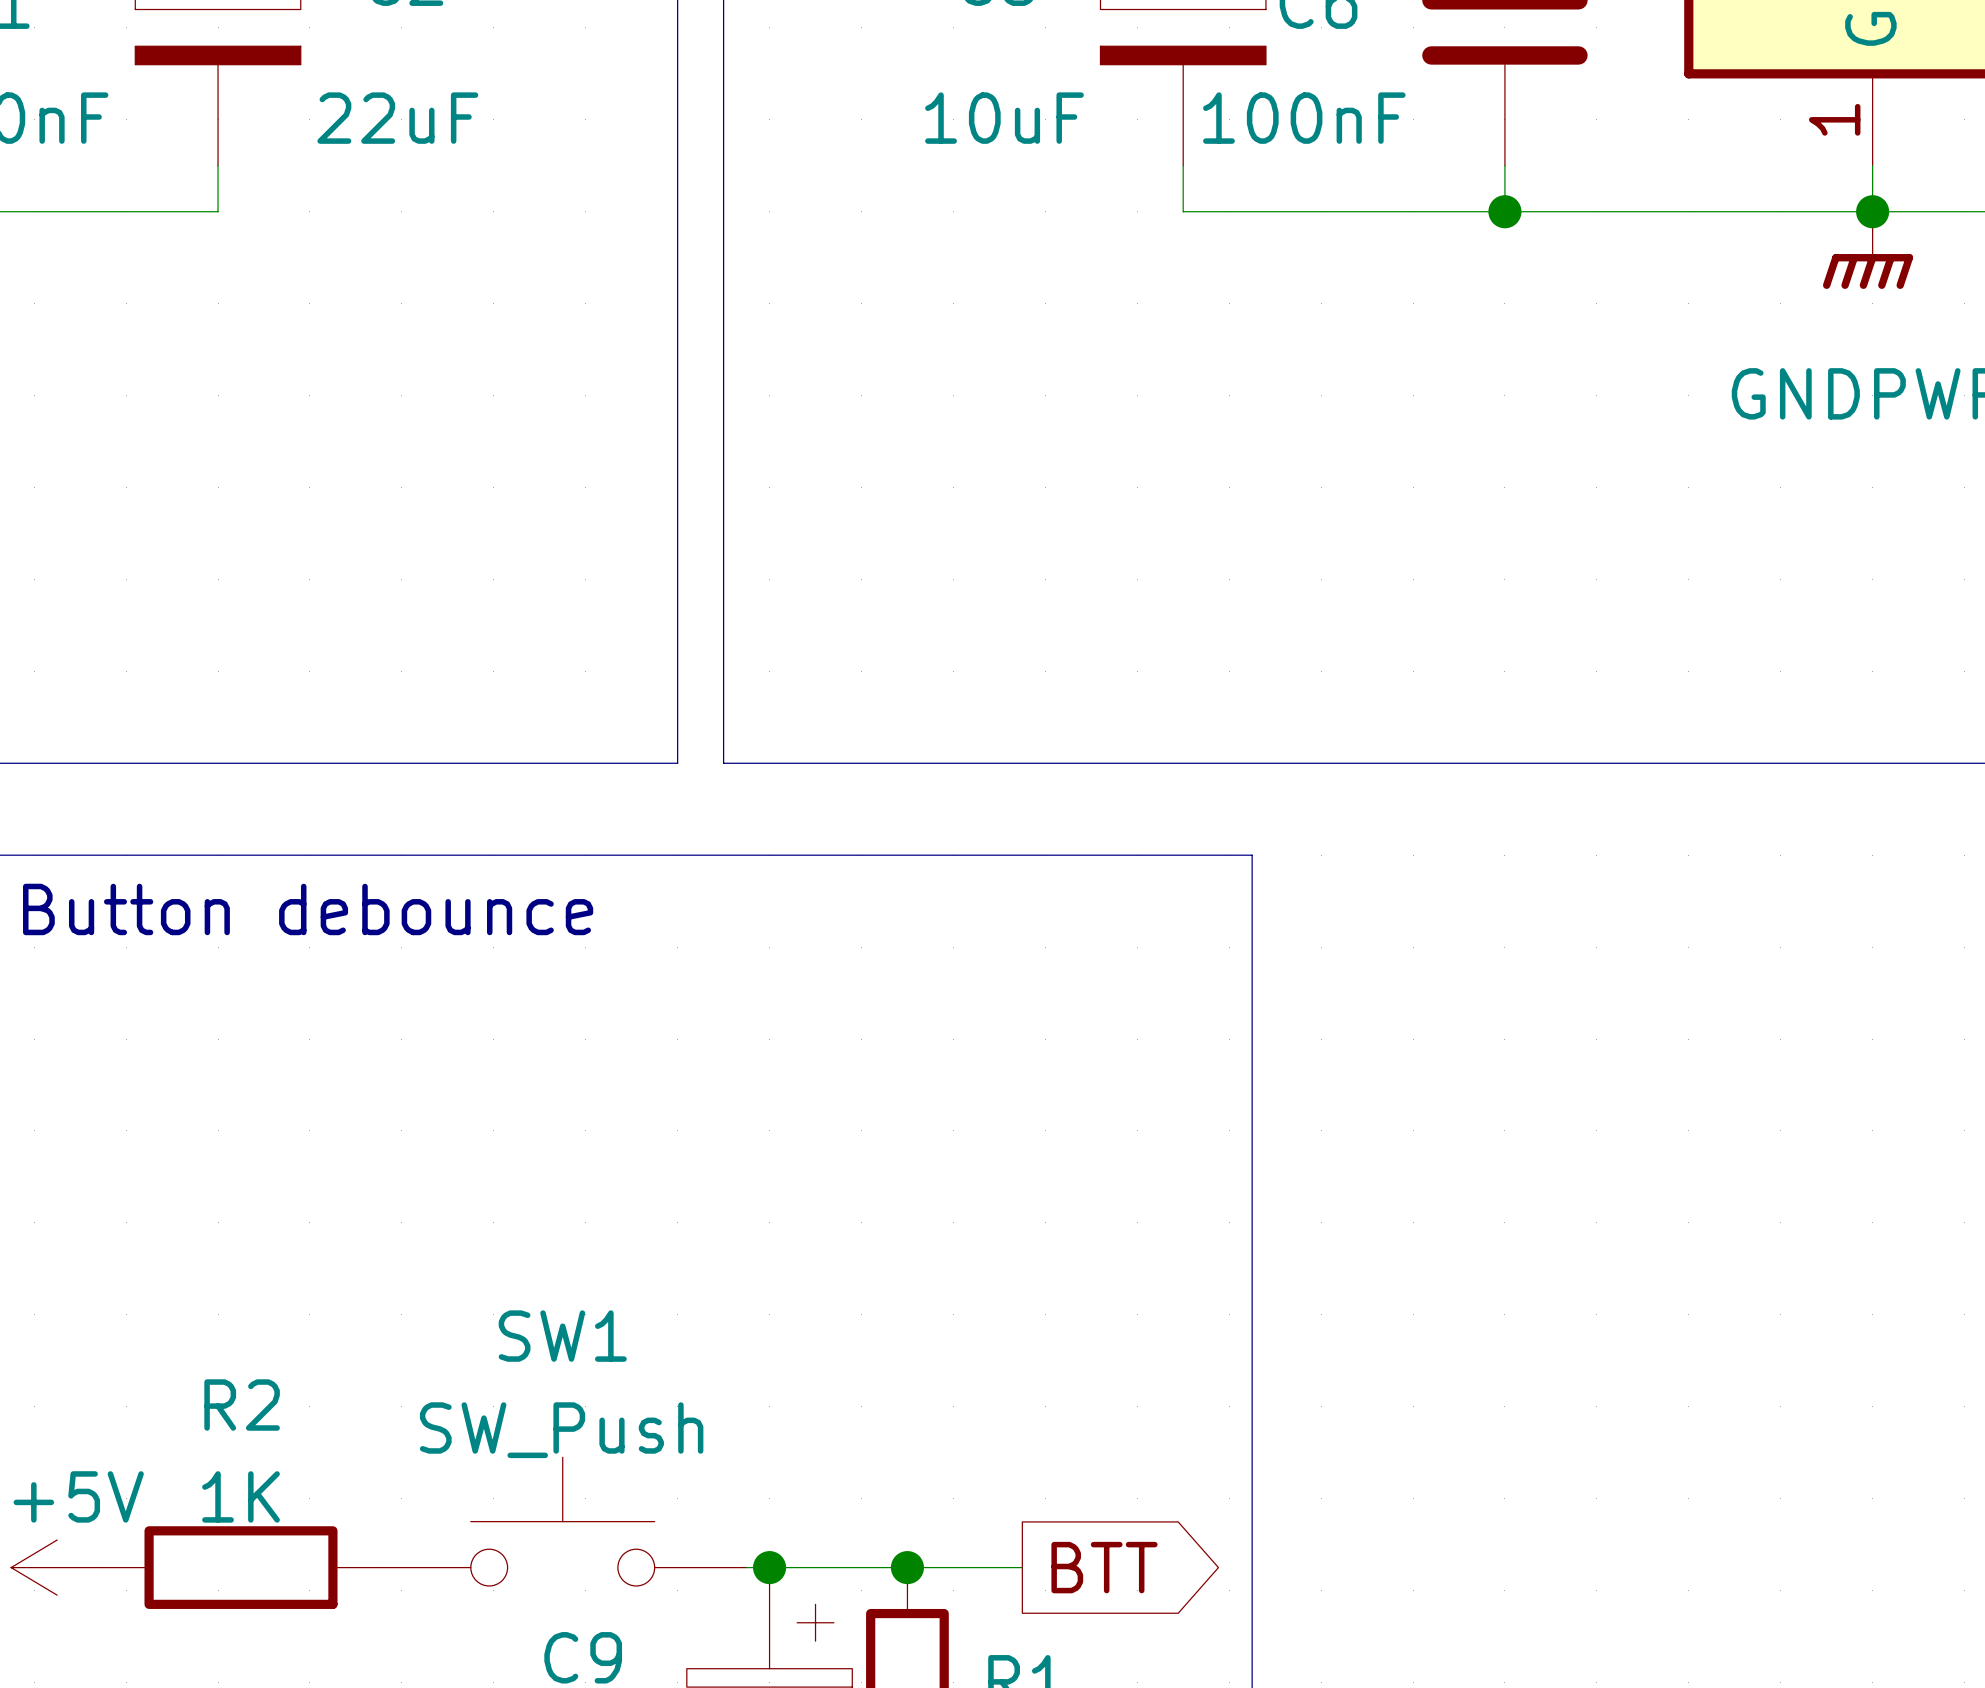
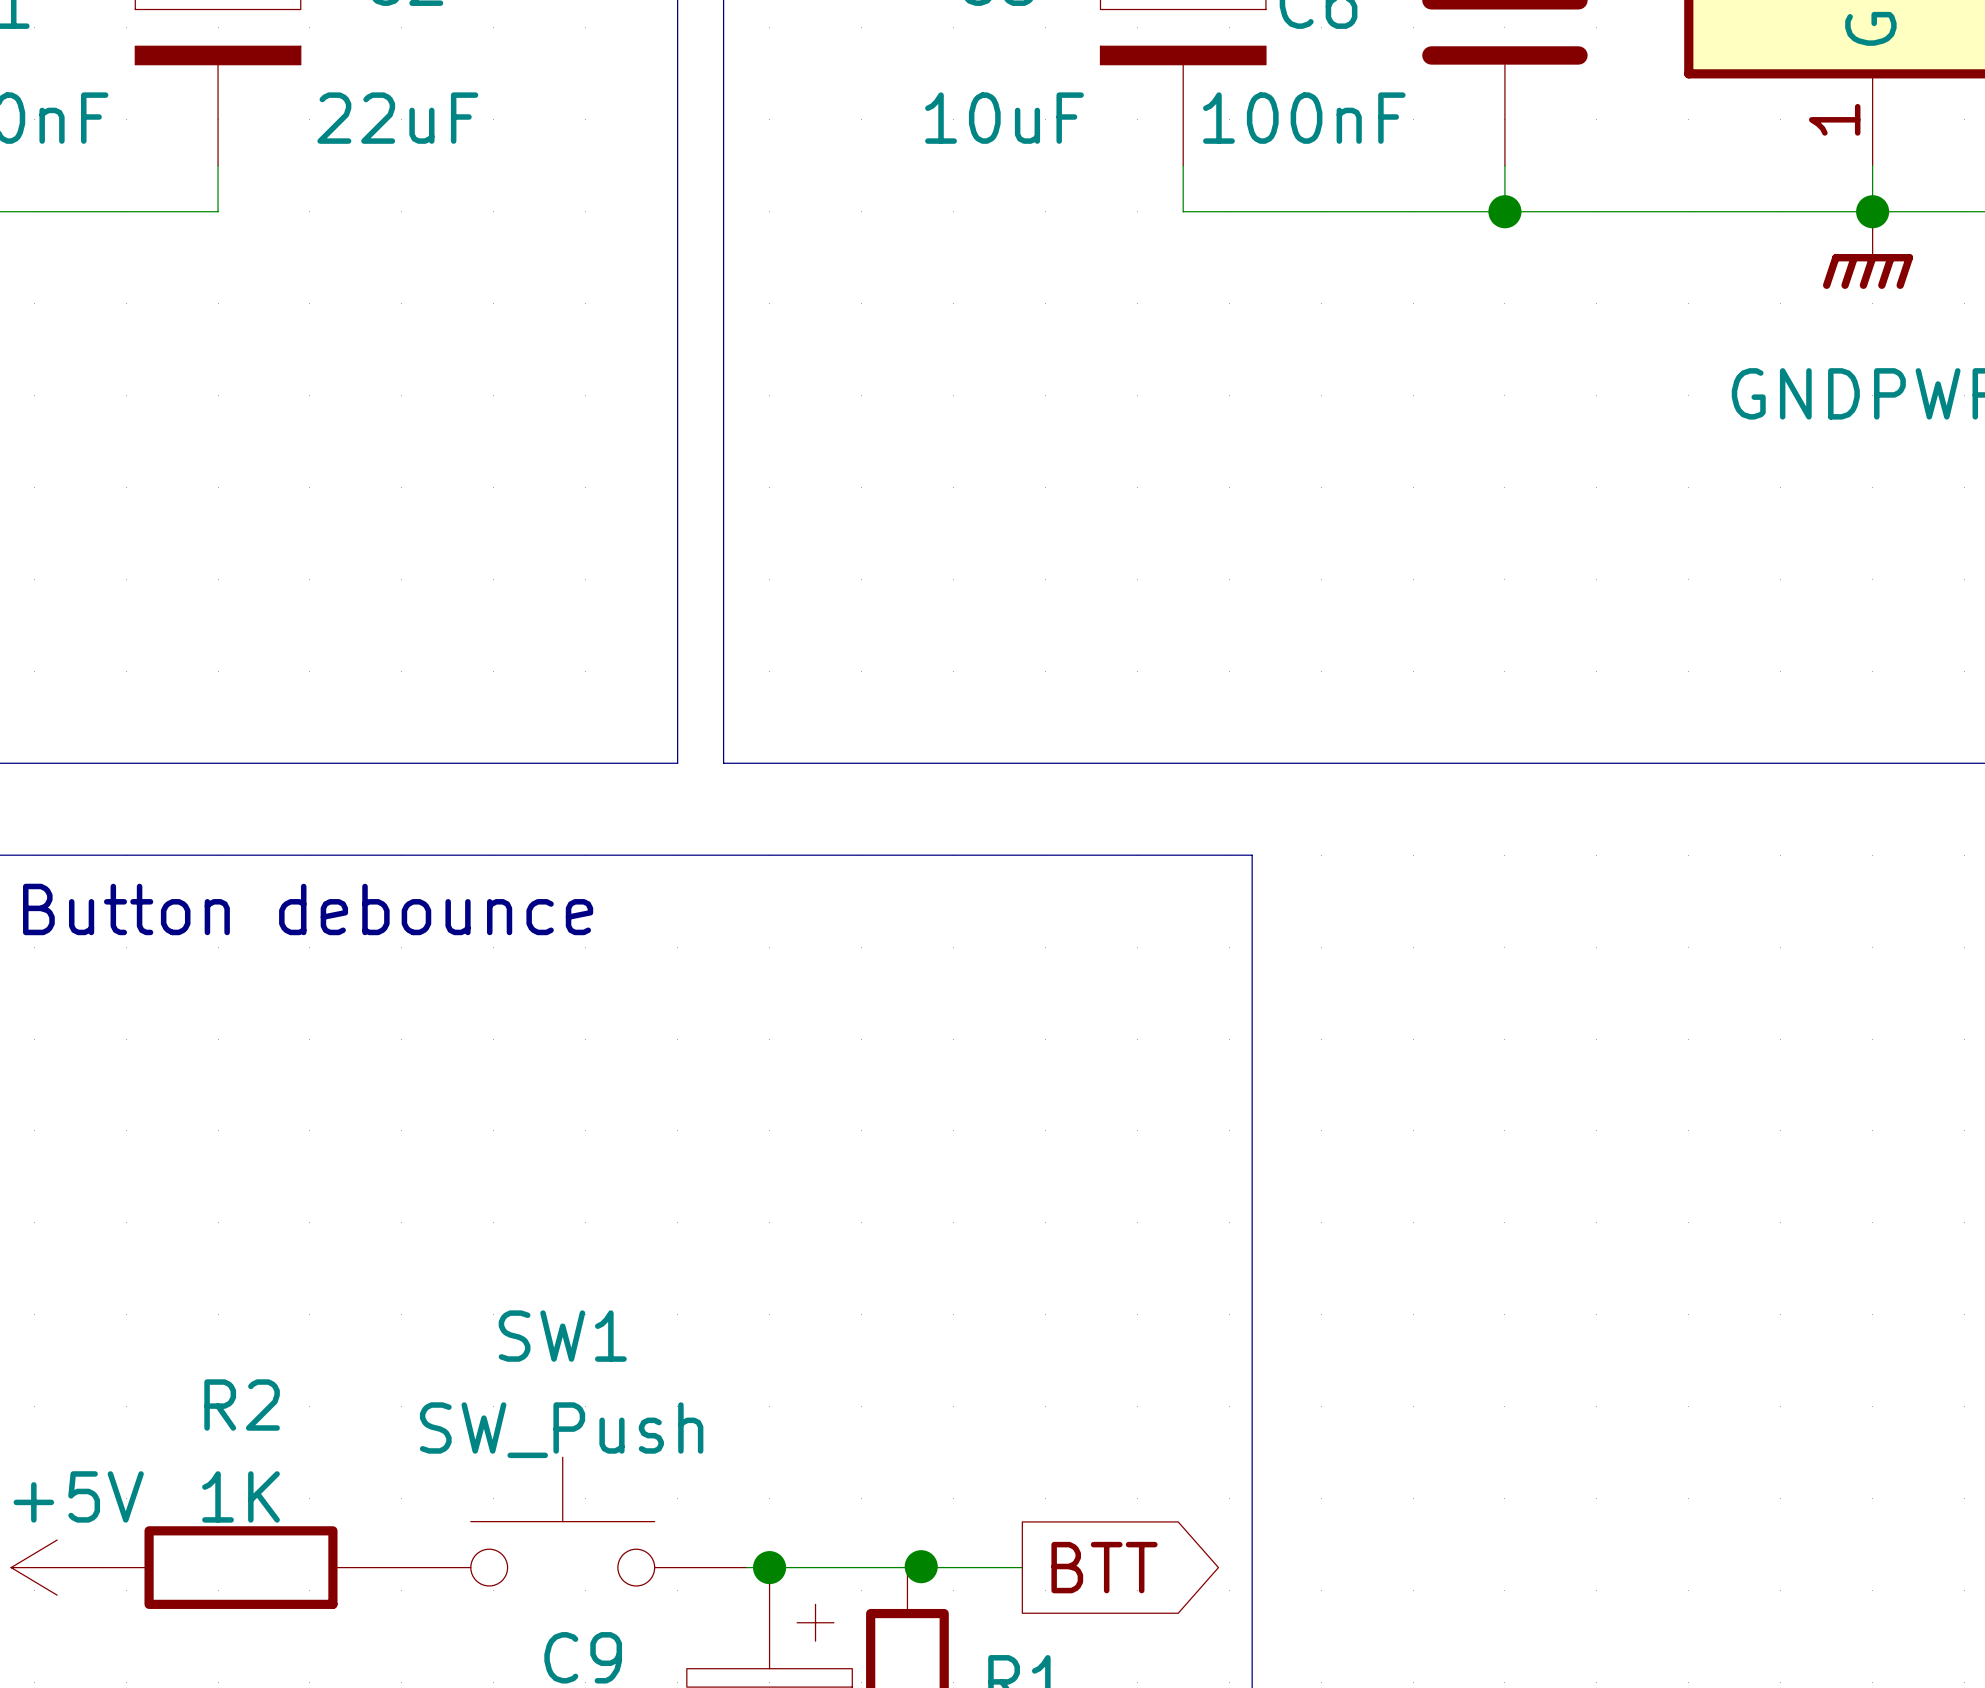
junction position: (907, 1567) -> (921, 1566)

